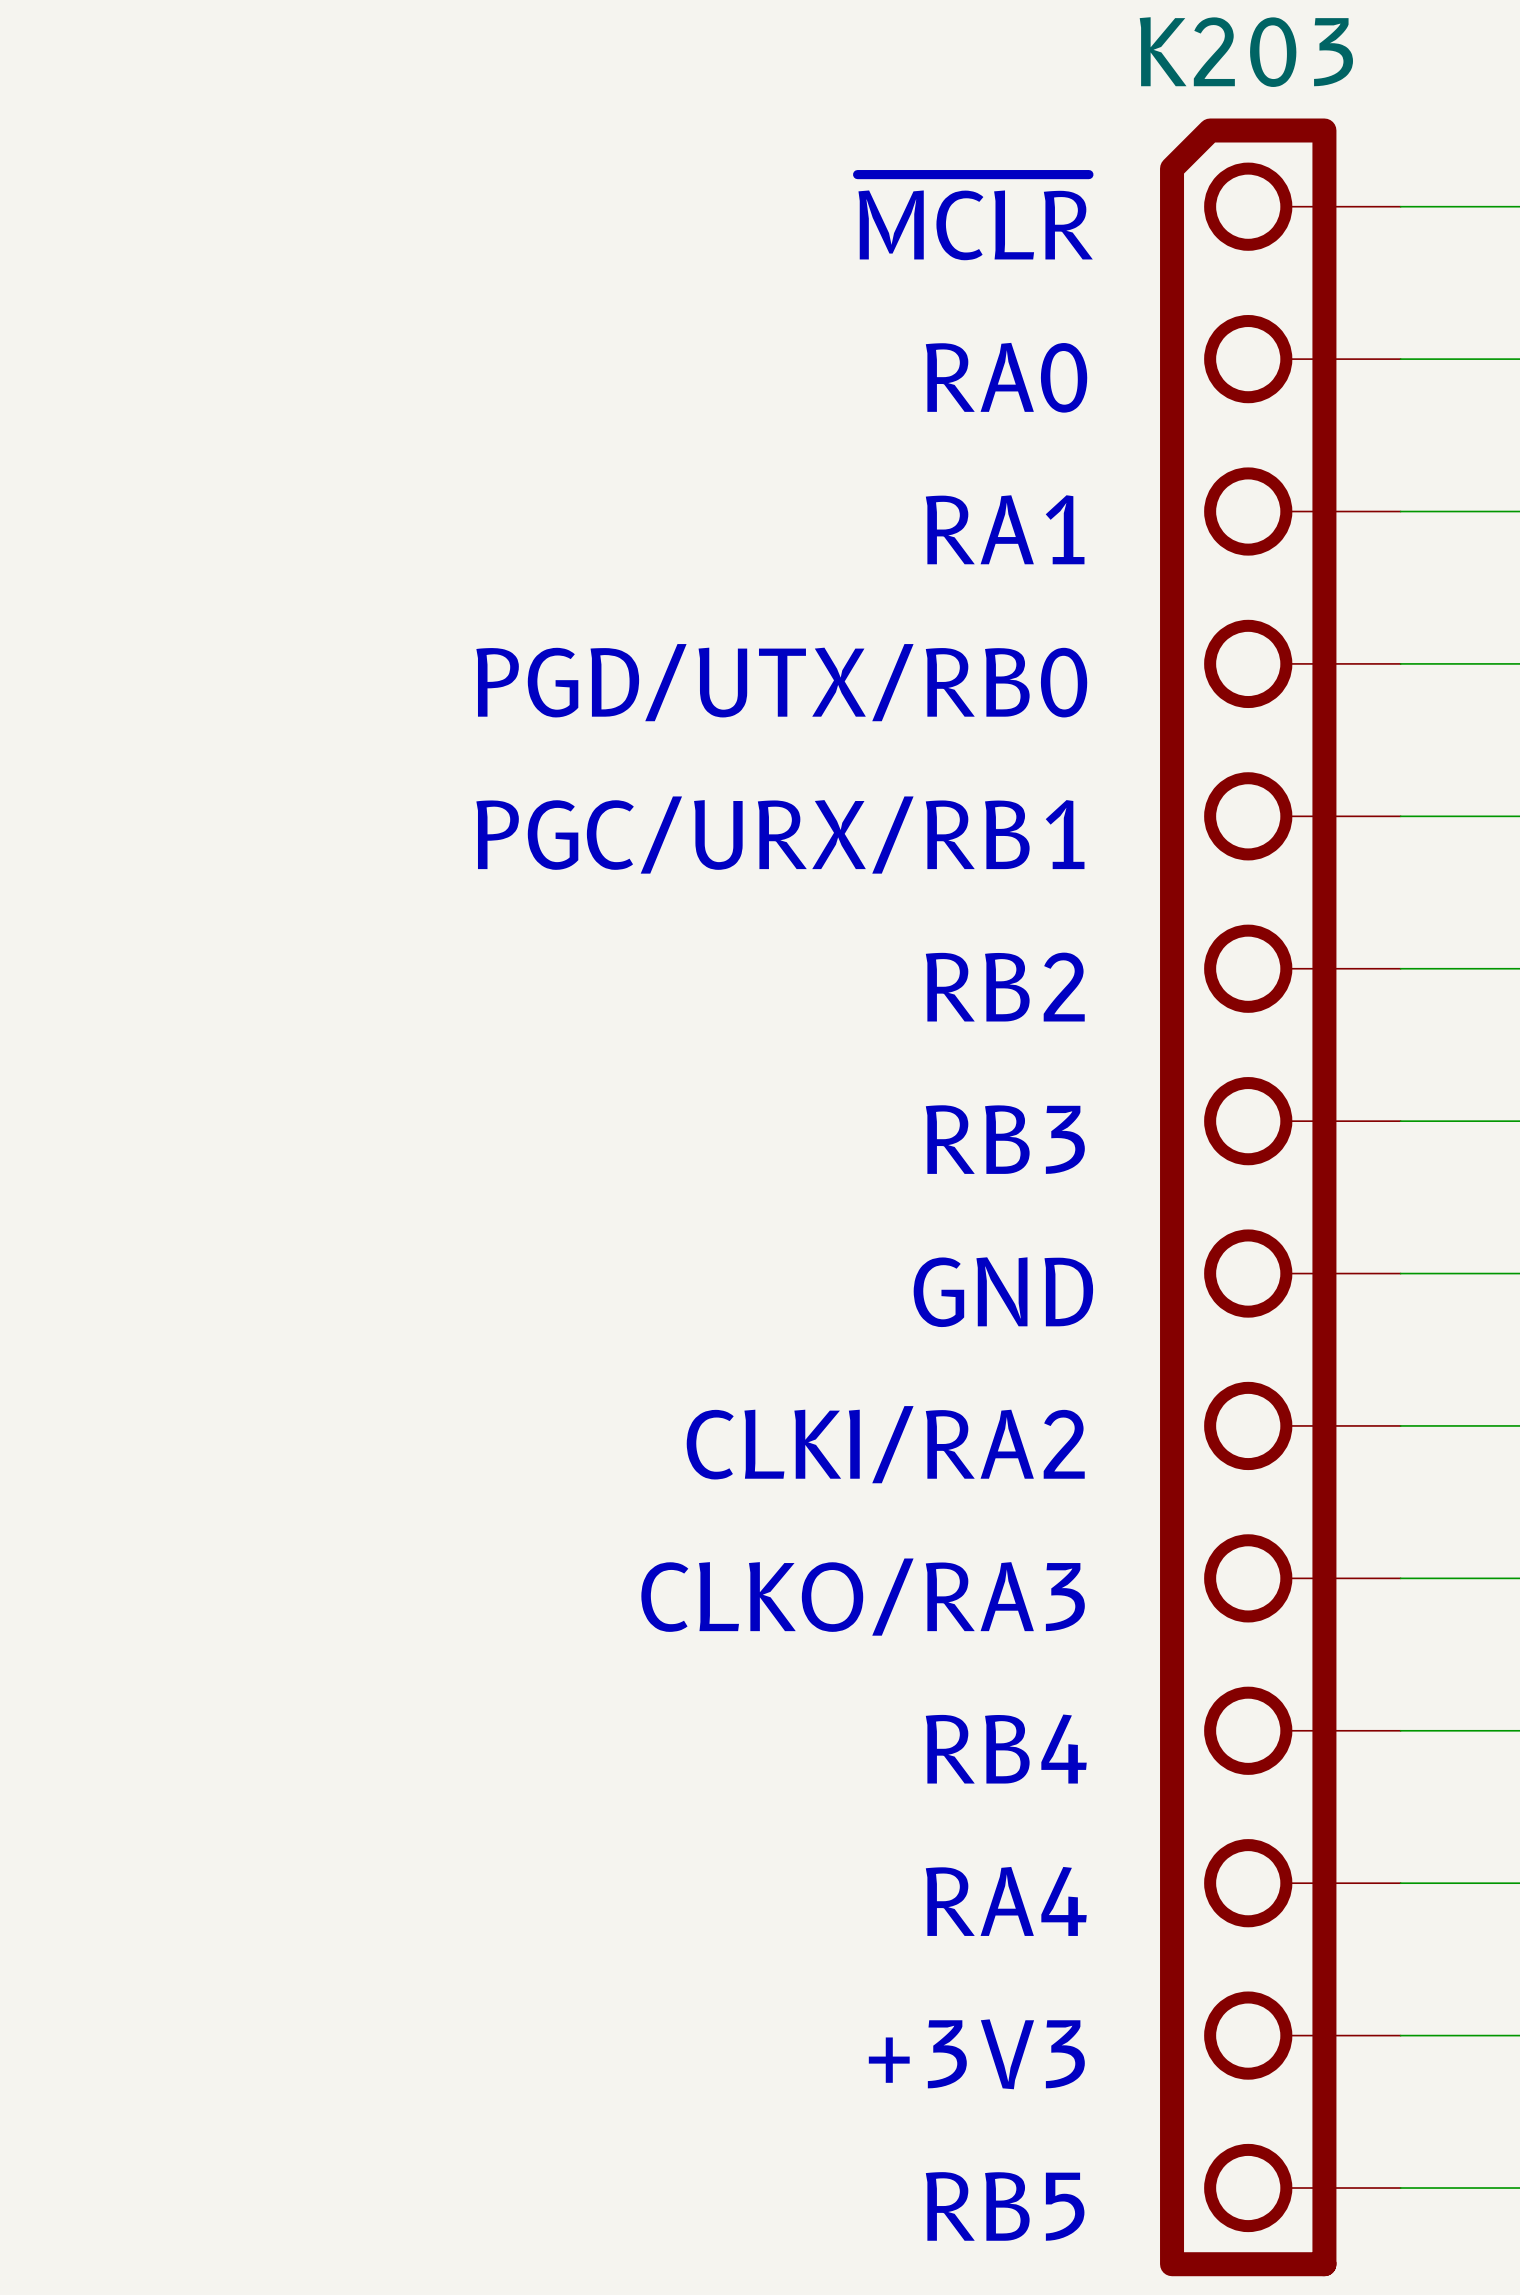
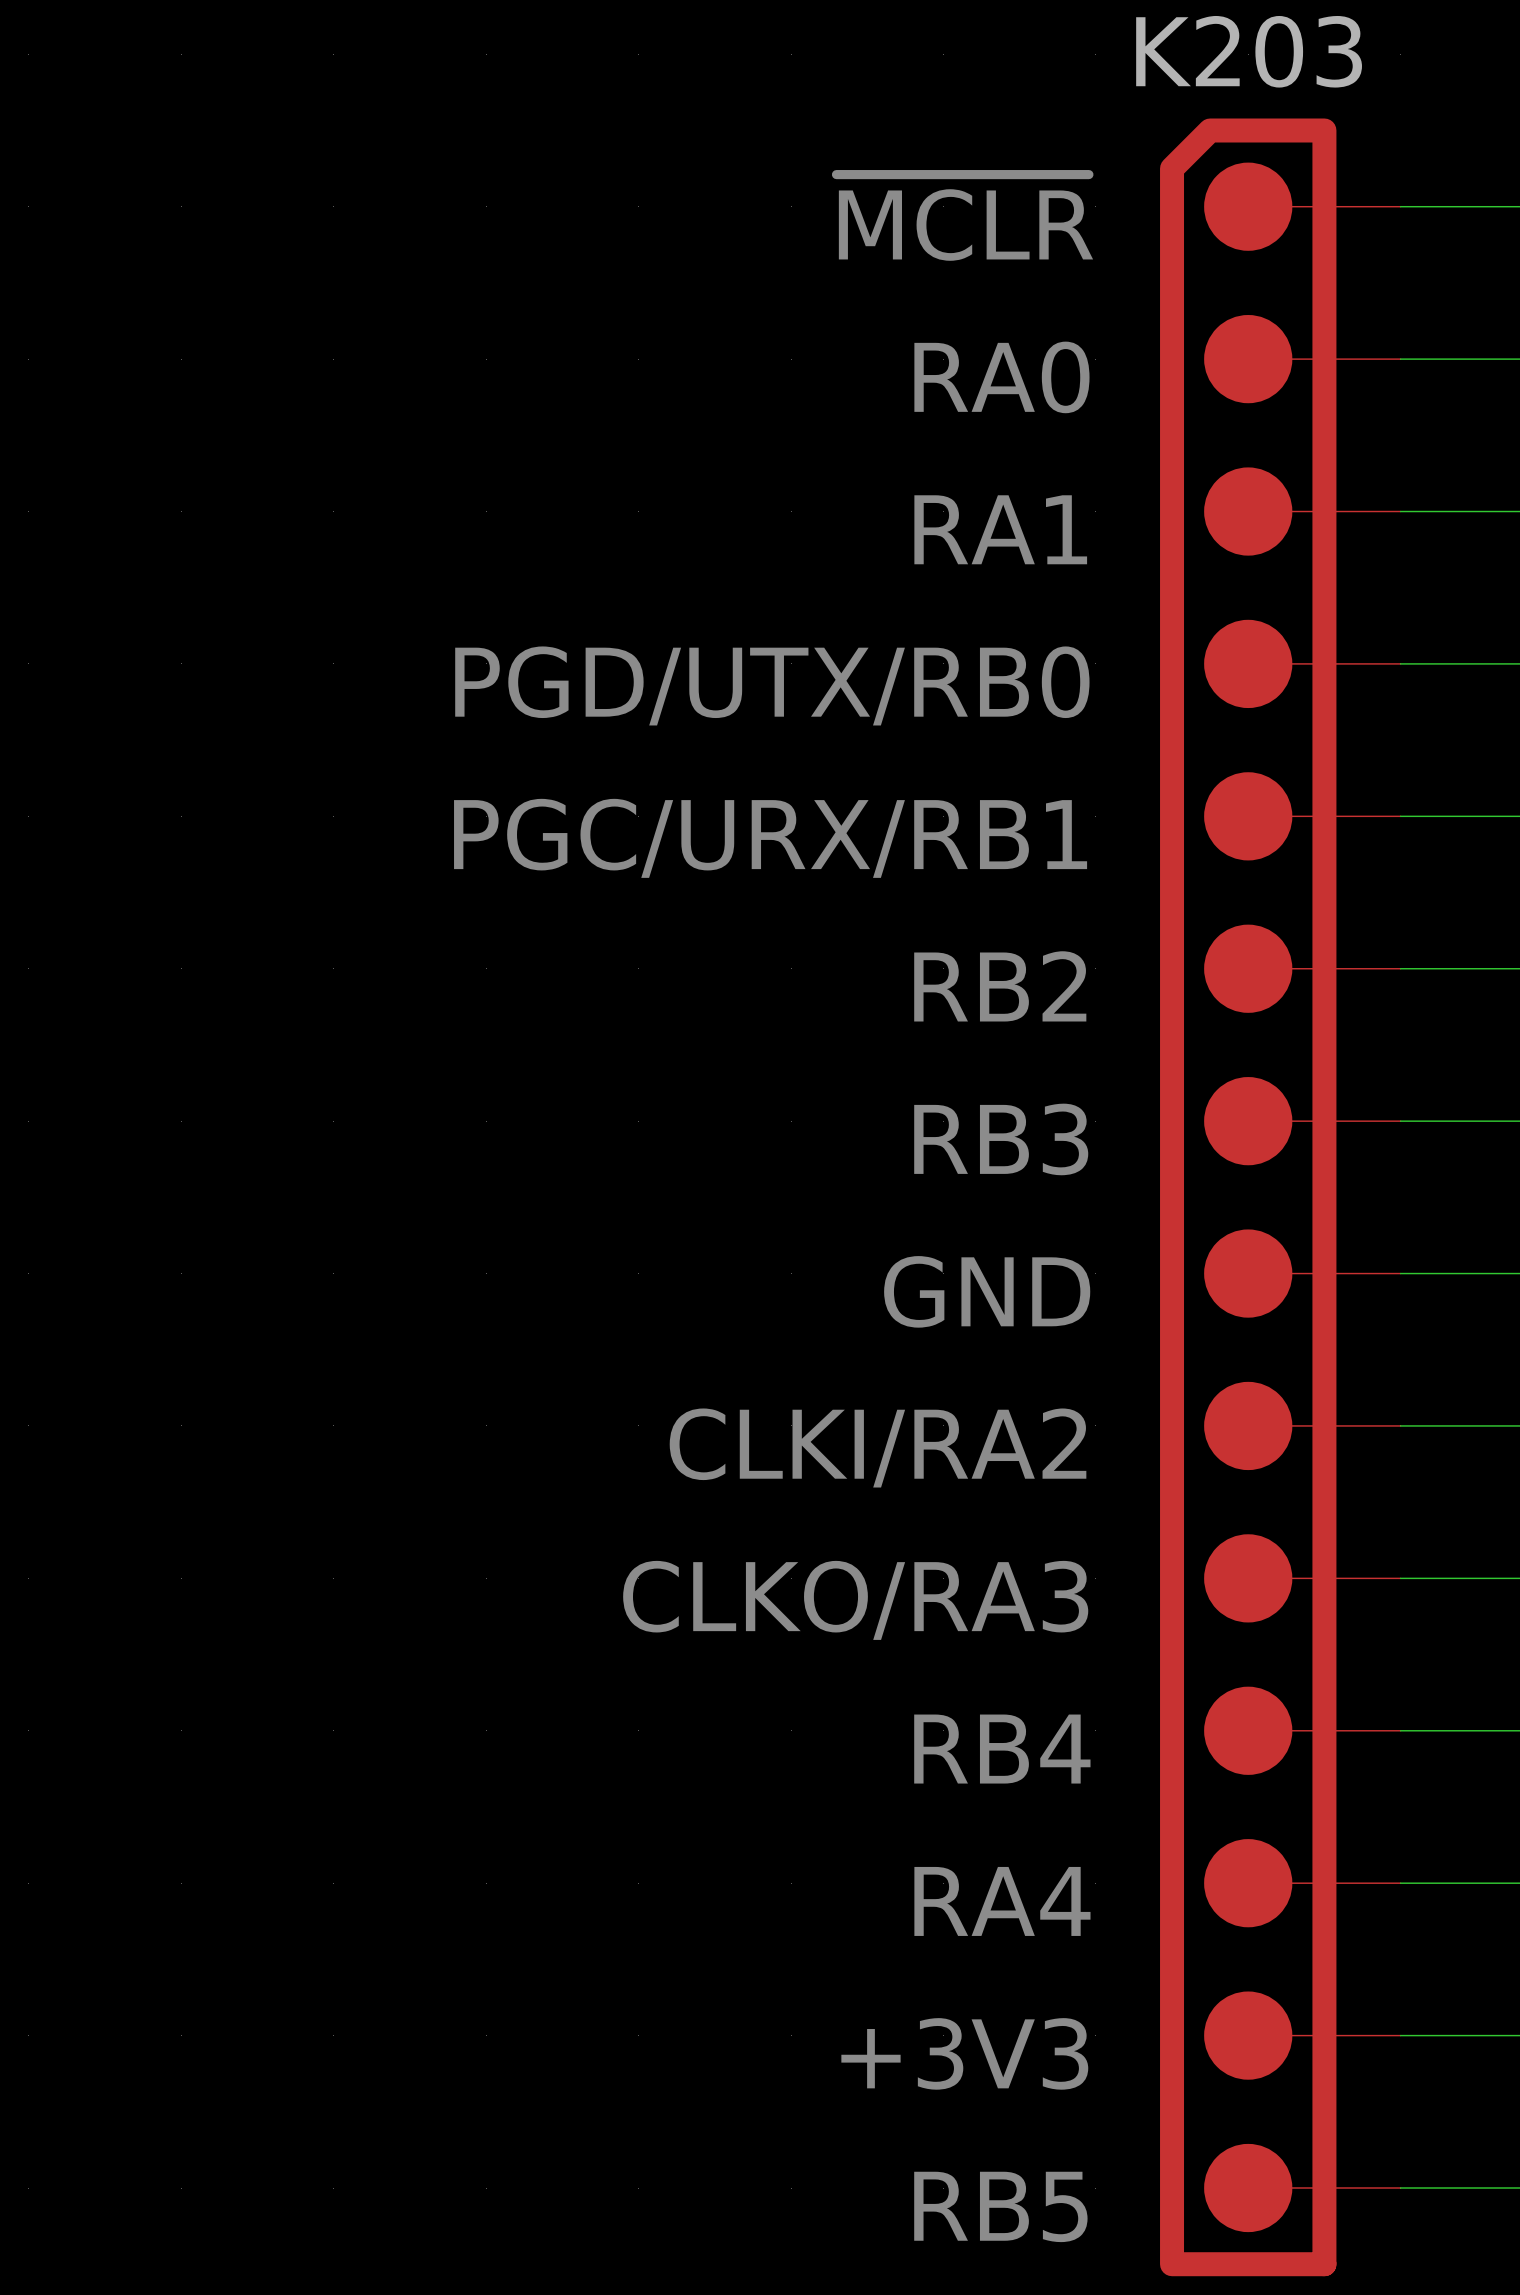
K203 symbol: [1160, 118, 1401, 2277] -> [1160, 118, 1401, 2277]

